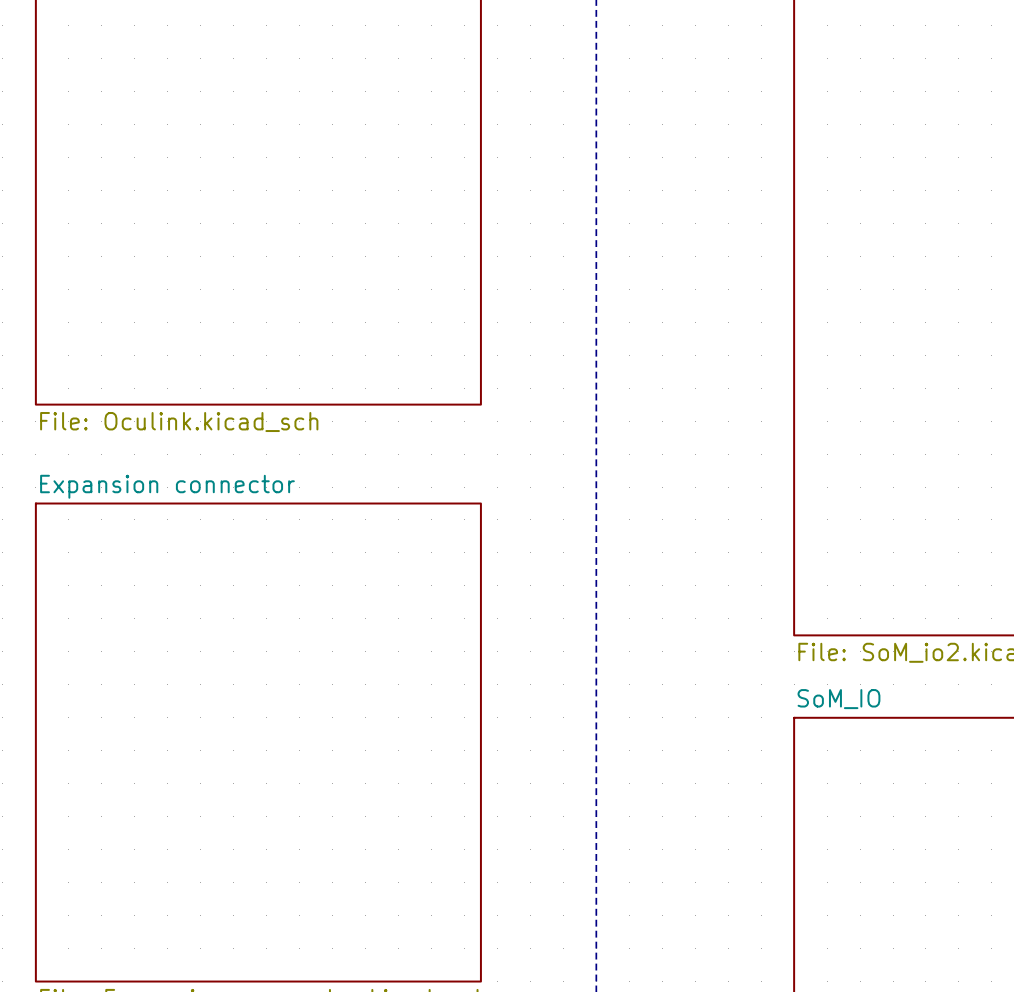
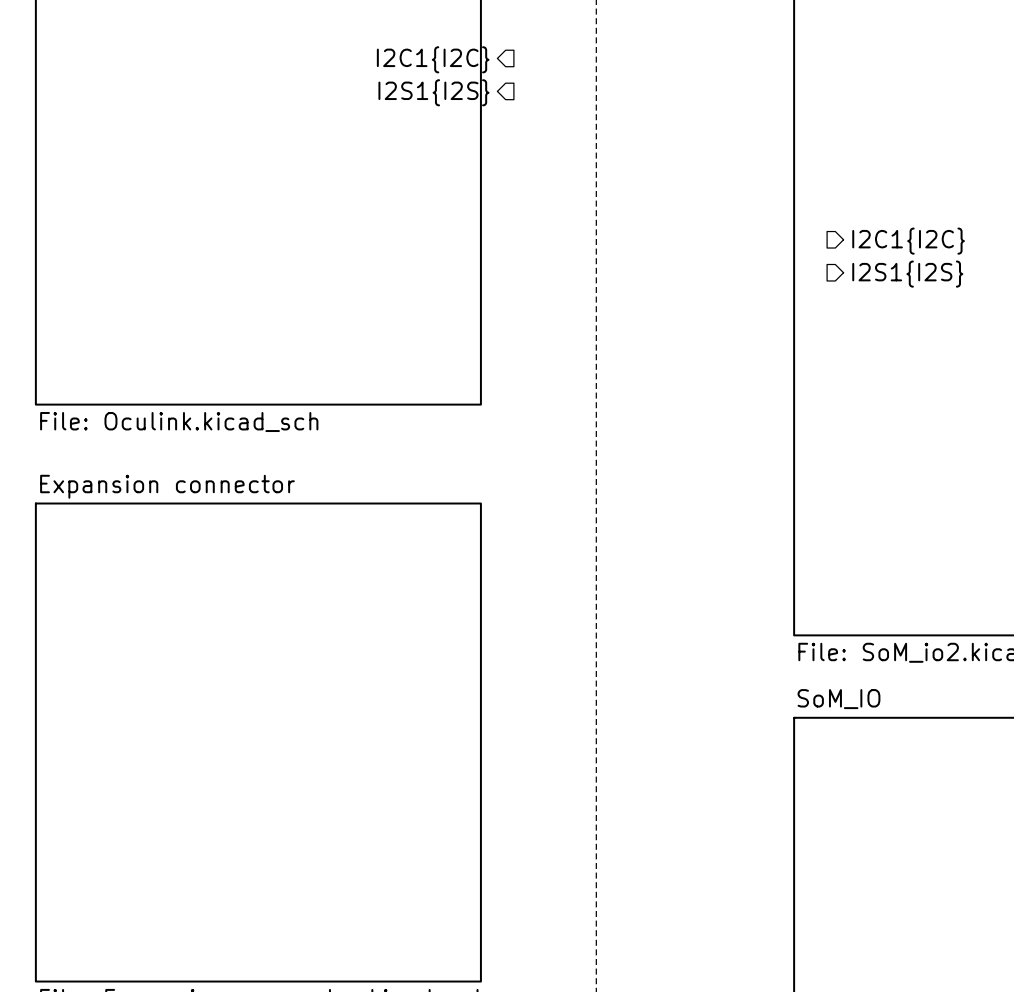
sheet pin: none -> I2C1{I2C} (433, 59)
sheet pin: none -> I2S1{I2S} (433, 92)
sheet pin: none -> I2C1{I2C} (908, 241)
sheet pin: none -> I2S1{I2S} (907, 274)

